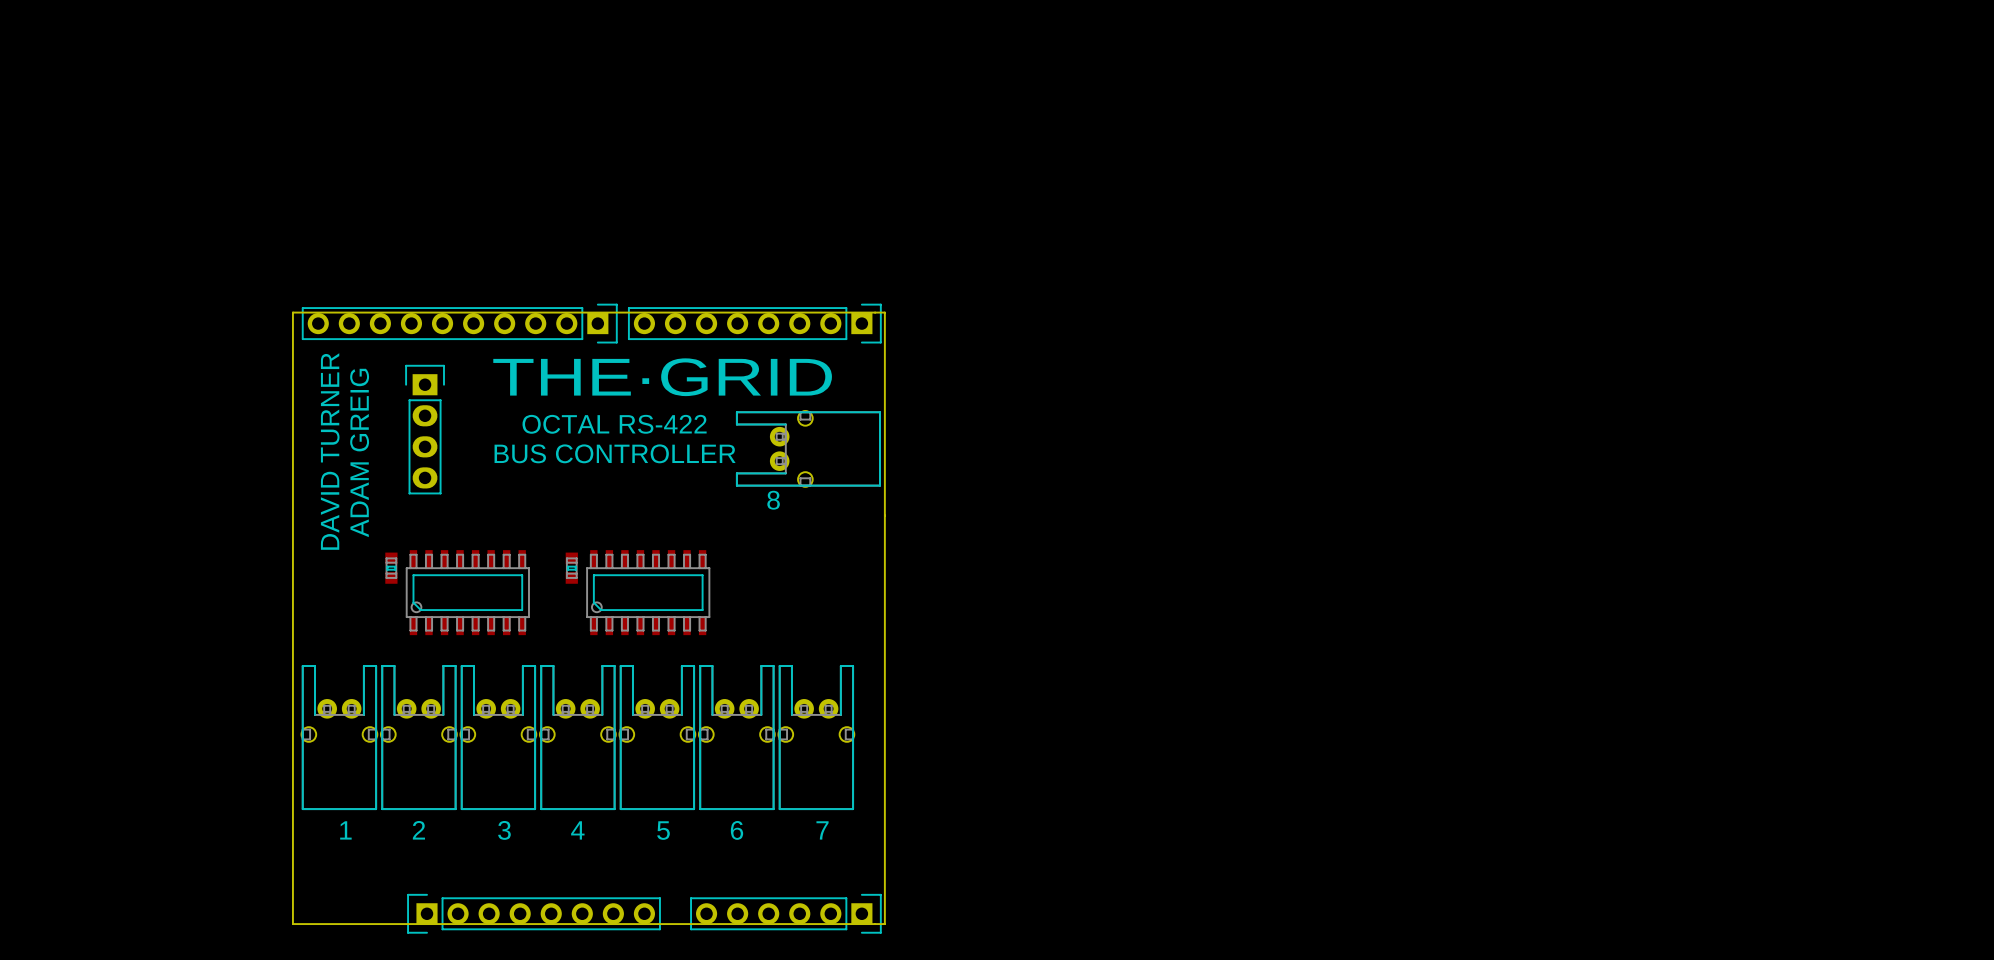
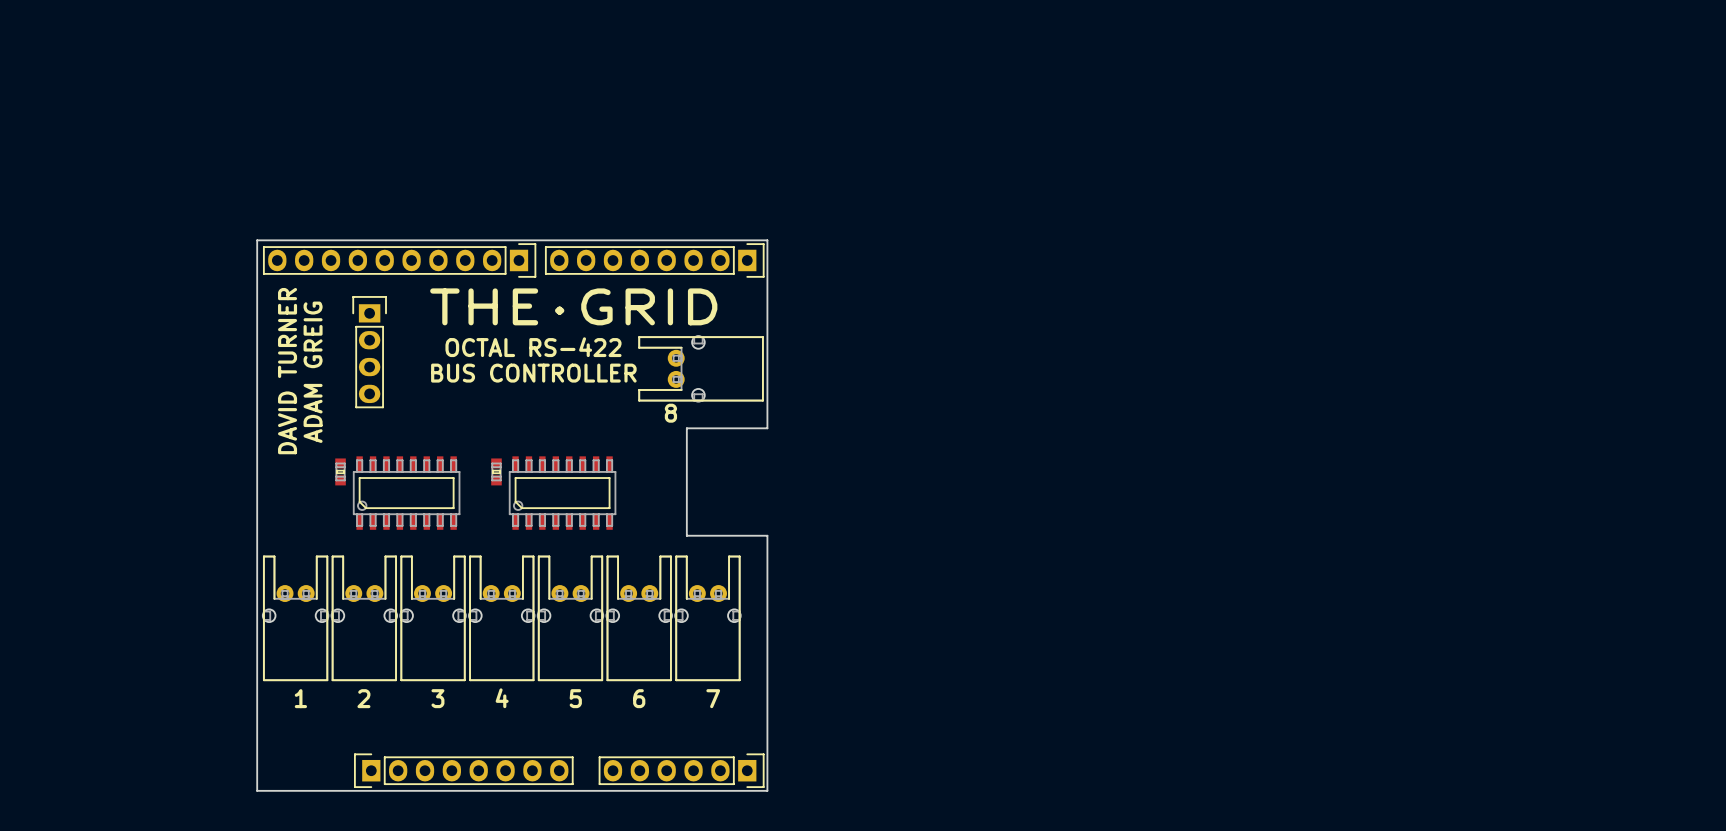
part footprint: [301, 303, 618, 344] -> [263, 243, 537, 278]
part footprint: [627, 303, 882, 344] -> [545, 243, 765, 278]
board edge: (292, 312) (292, 924) (884, 924) (884, 312) (292, 312) -> (257, 240) (257, 790) (767, 790) (767, 535) (686, 535) (686, 428) (767, 428) (767, 240) (257, 240)
part footprint: [407, 893, 661, 934] -> [354, 753, 574, 788]
part footprint: [690, 893, 882, 934] -> [598, 753, 765, 788]

